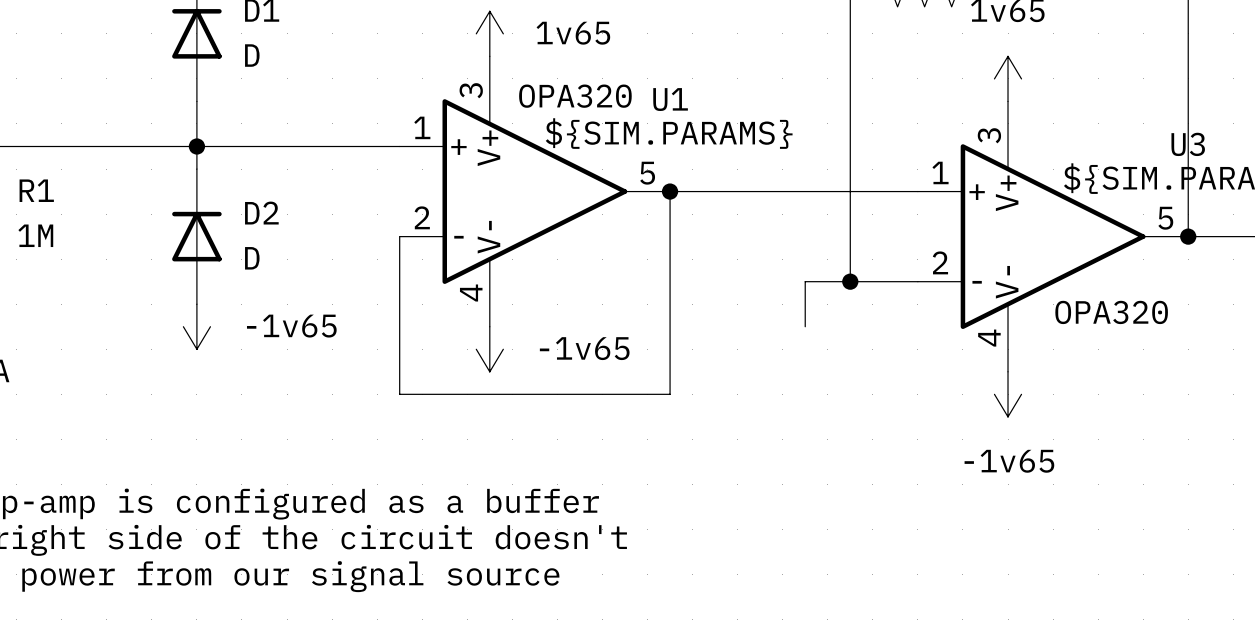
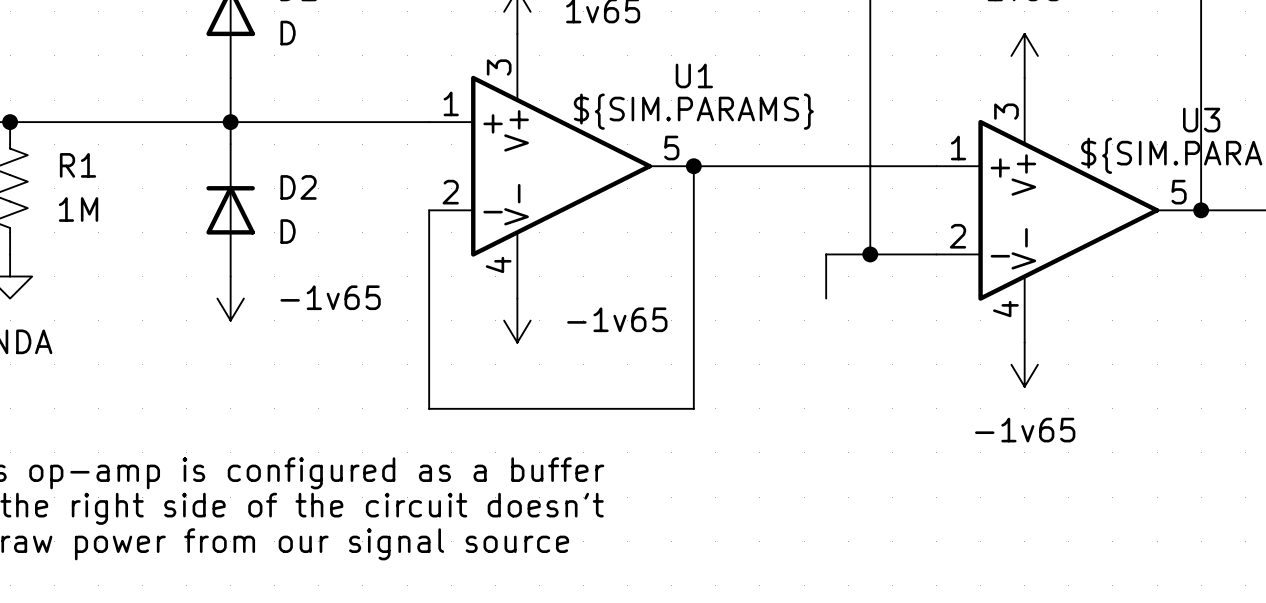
text: OPA320 (575, 96) -> none
text: OPA320 (1111, 312) -> none
wire: (399, 394) (670, 394) -> (429, 364) (429, 408) (693, 408) (693, 364)

